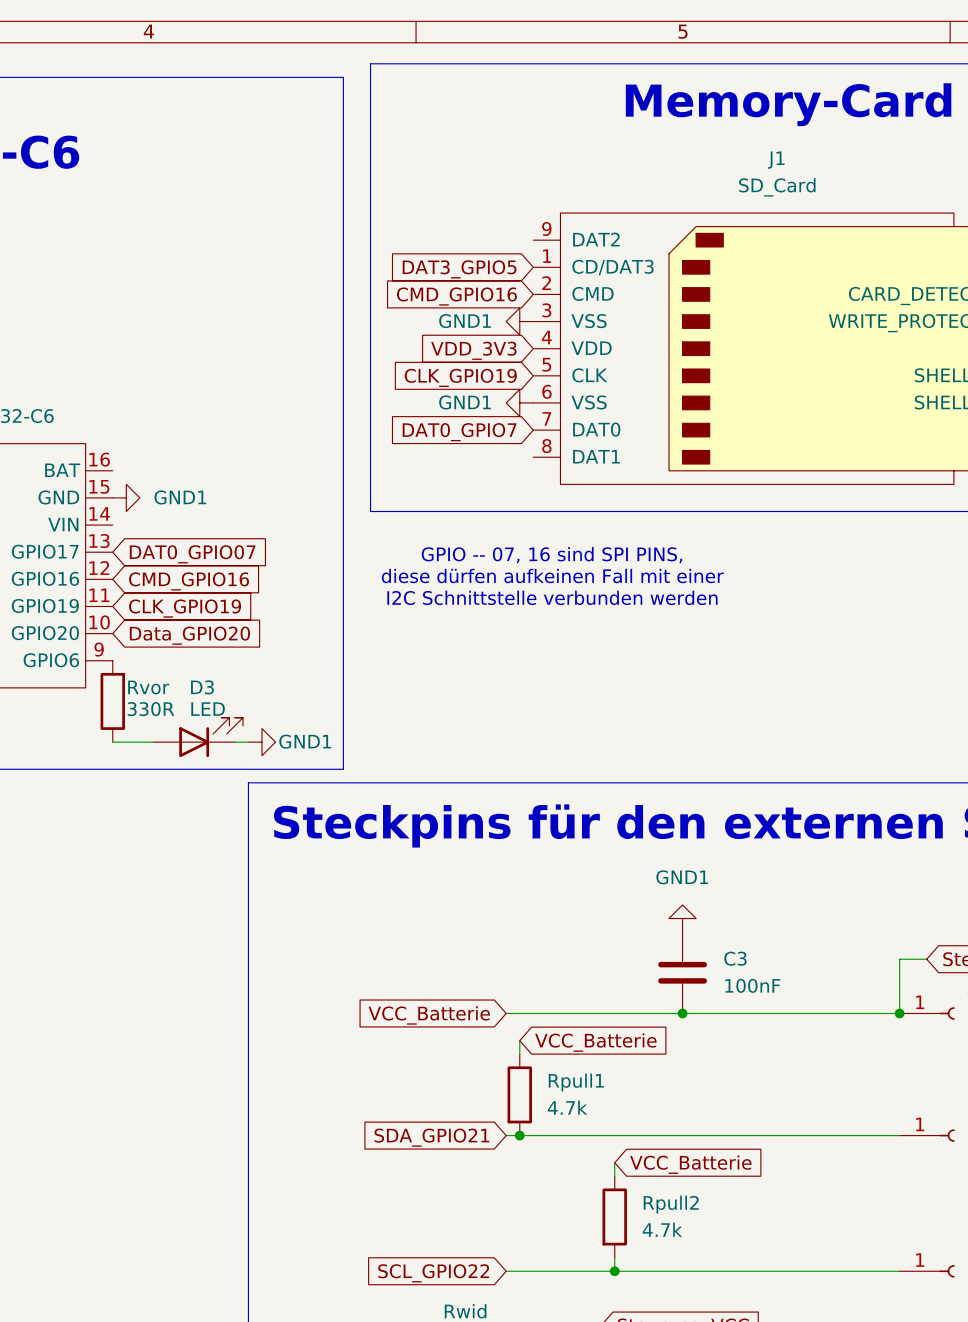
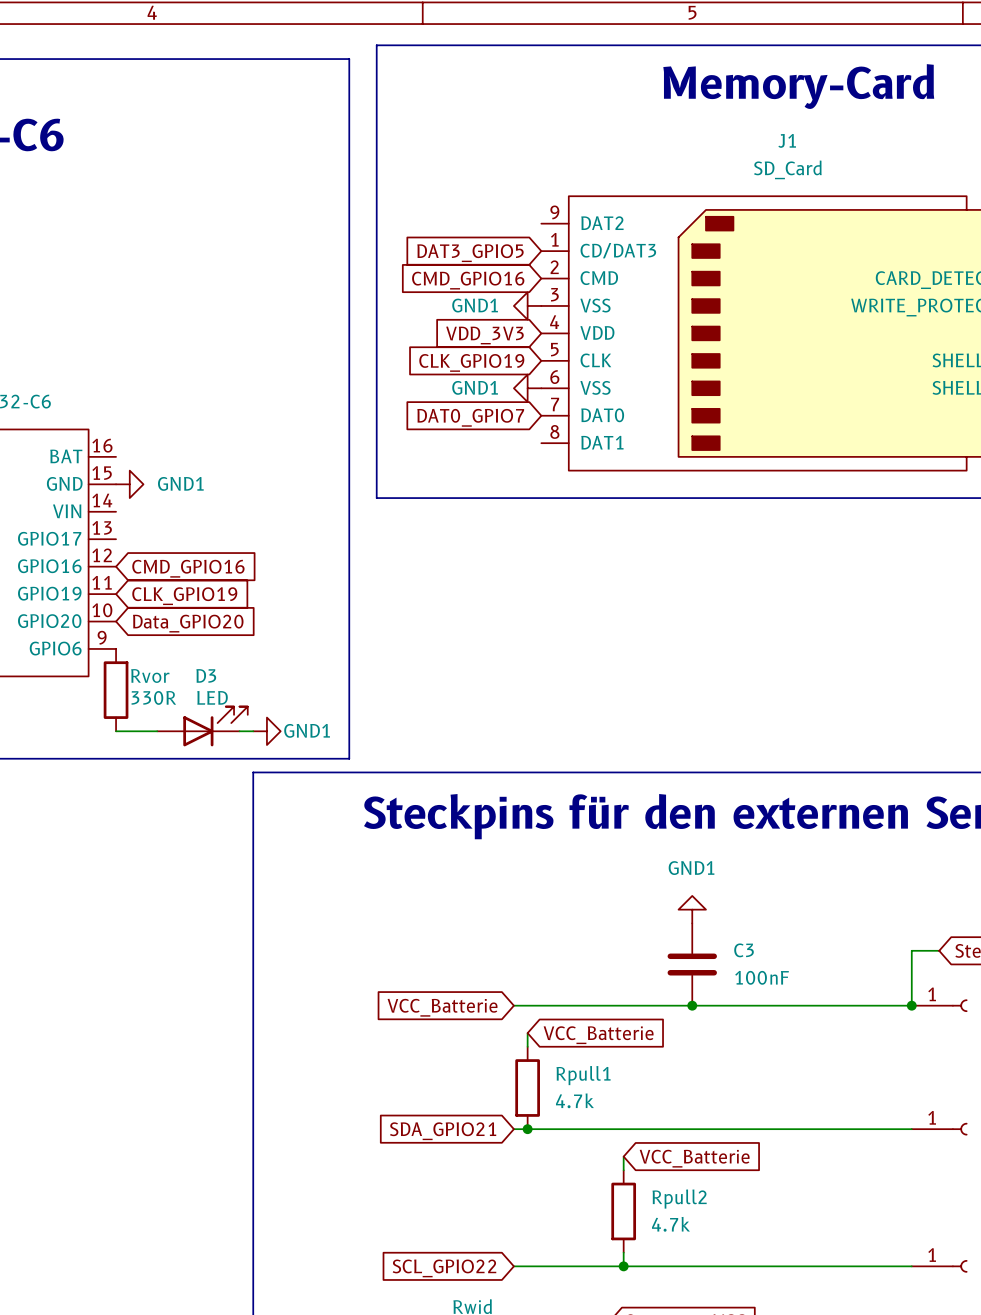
global label: DAT0_GPIO07 (192, 554) -> none
text: GPIO -- 07, 16 sind SPI PINS, (551, 555) -> none
text: diese dürfen aufkeinen Fall mit einer (552, 576) -> none
text: I2C Schnittstelle verbunden werden (552, 597) -> none

